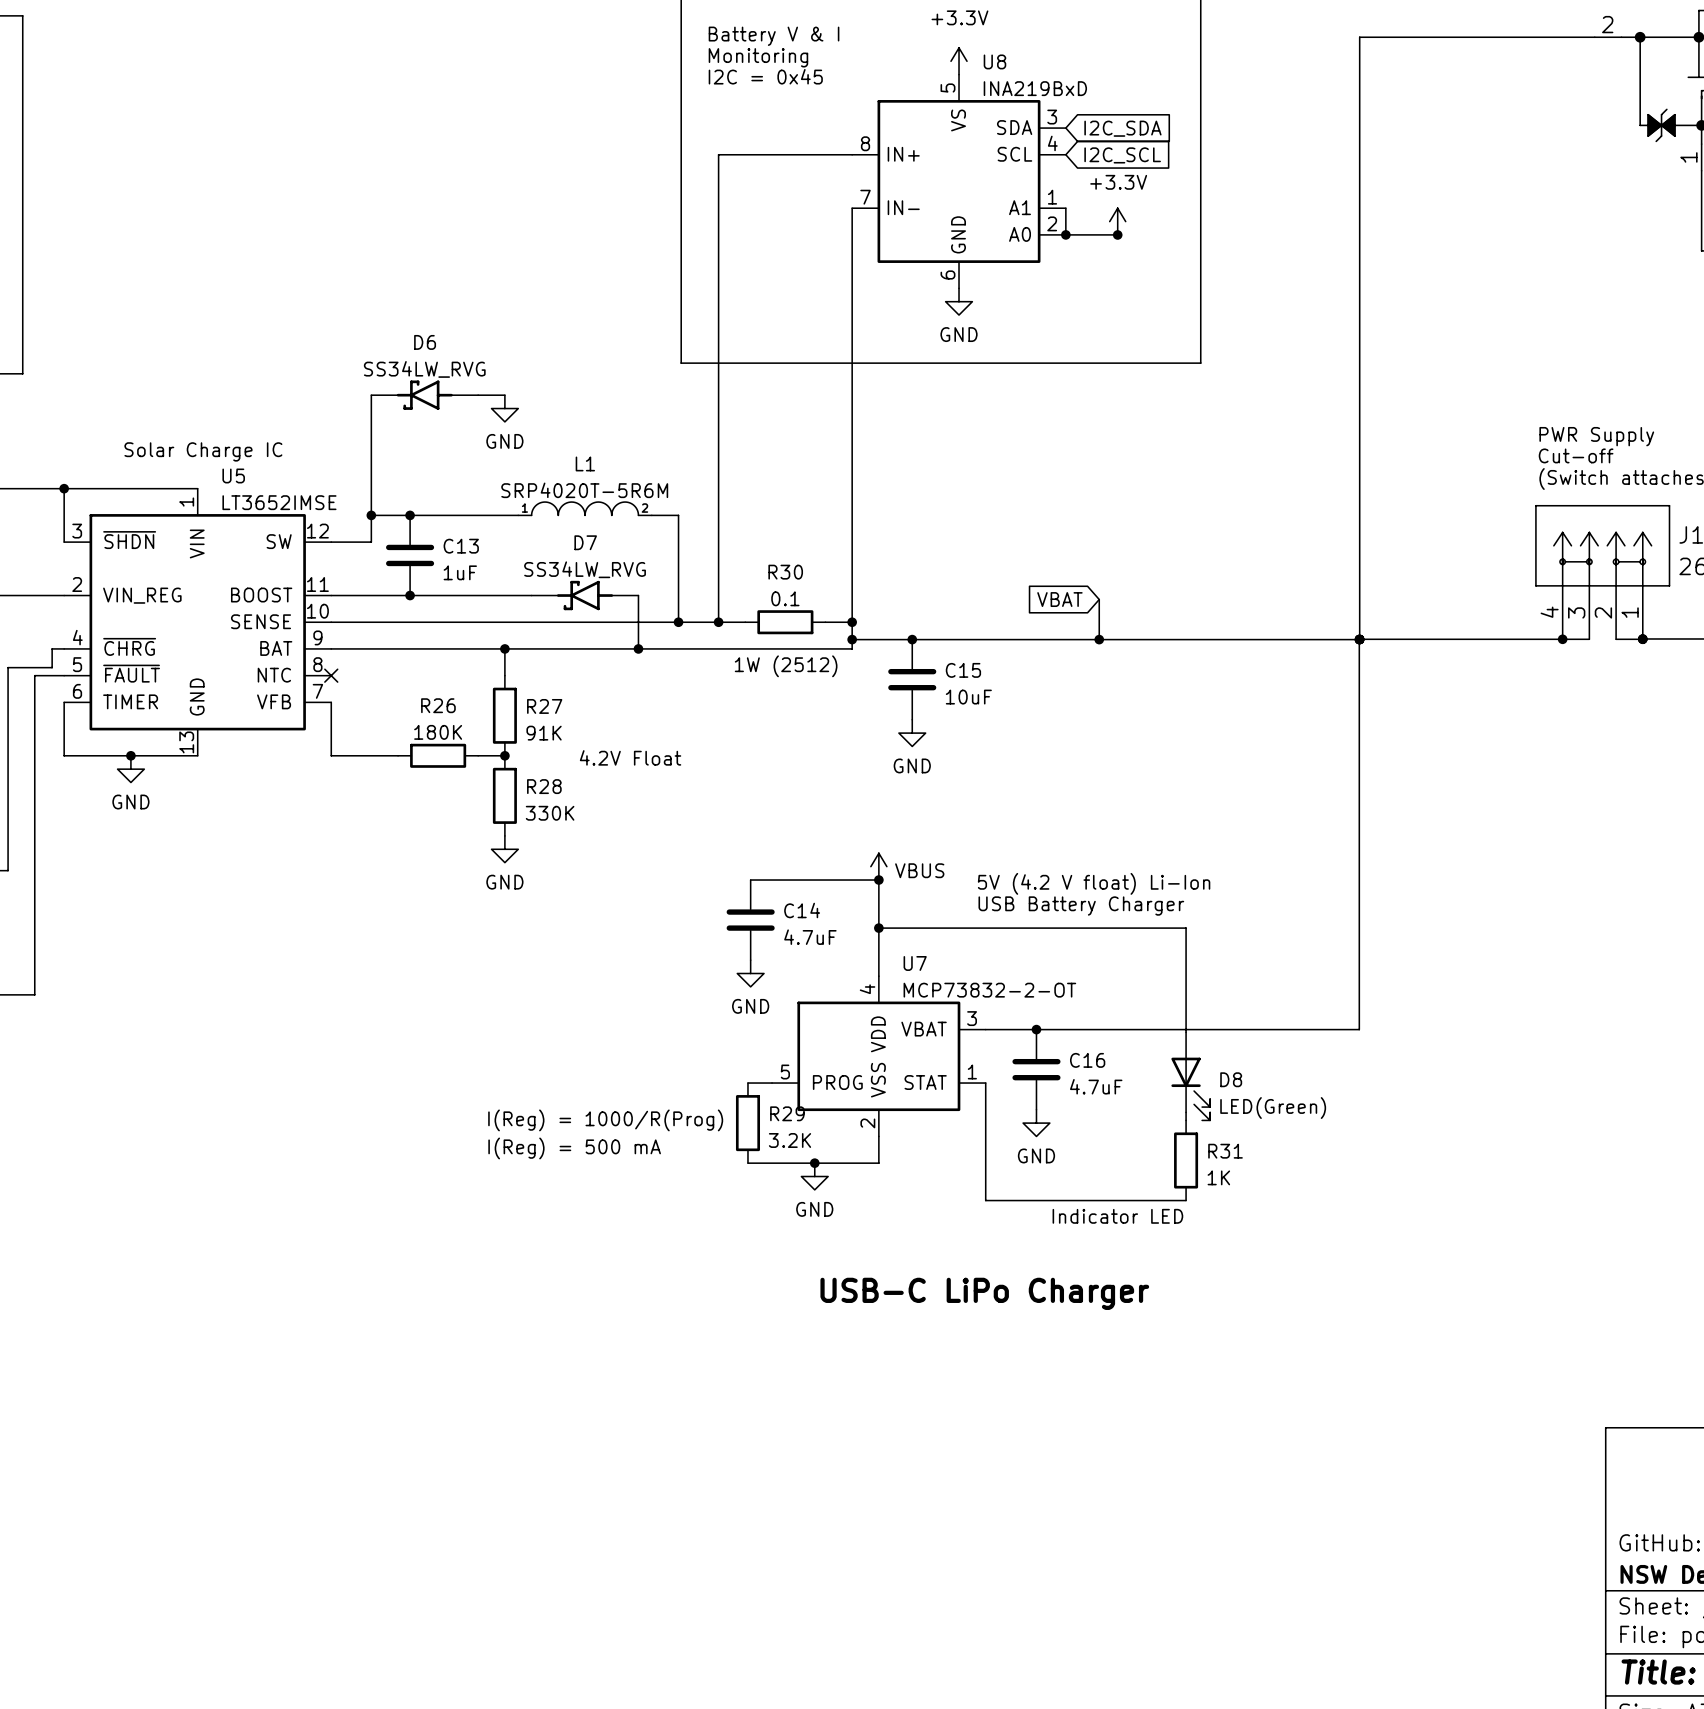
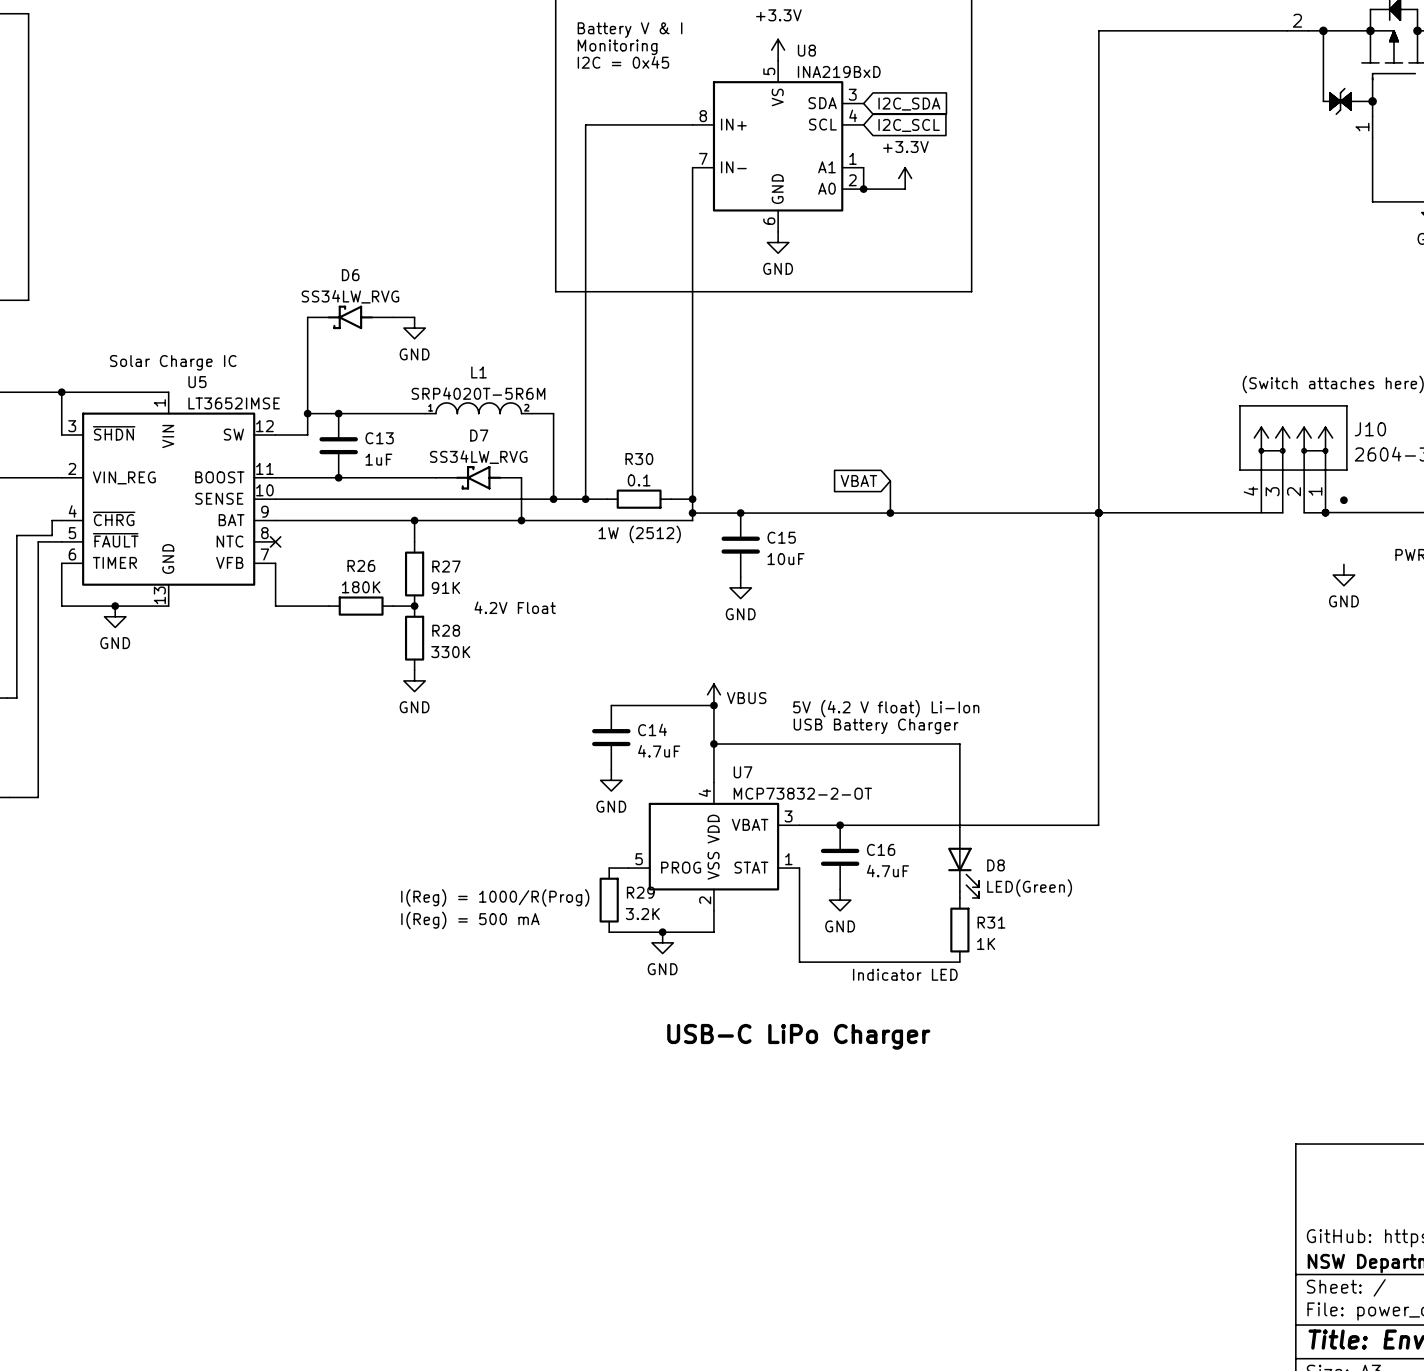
junction: (1117, 234) -> none
text: PWR Supply (1596, 436) -> none
text: Cut-off (1576, 455) -> none
junction: none -> (1343, 500)
junction: (1562, 639) -> none
power symbol: none -> GND (1343, 575)

